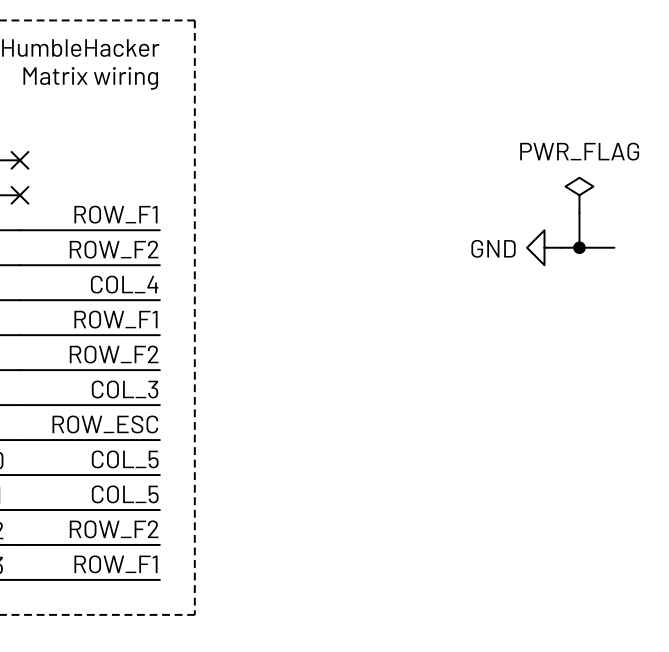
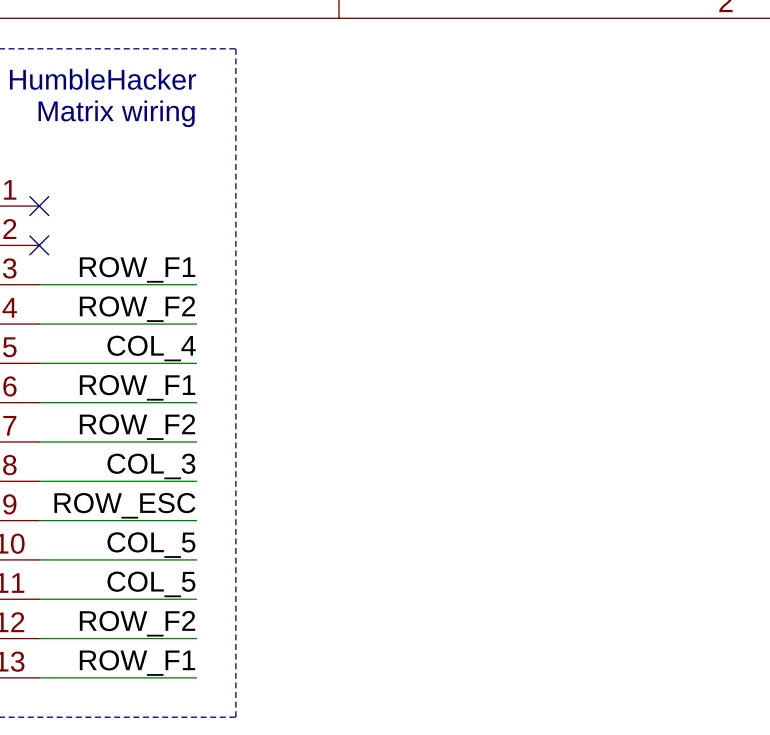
power symbol: PWR_FLAG (579, 195) -> none
wire: (579, 212) (579, 247) -> none
power symbol: GND (544, 247) -> none
wire: (561, 247) (614, 247) -> none
junction: (579, 247) -> none

